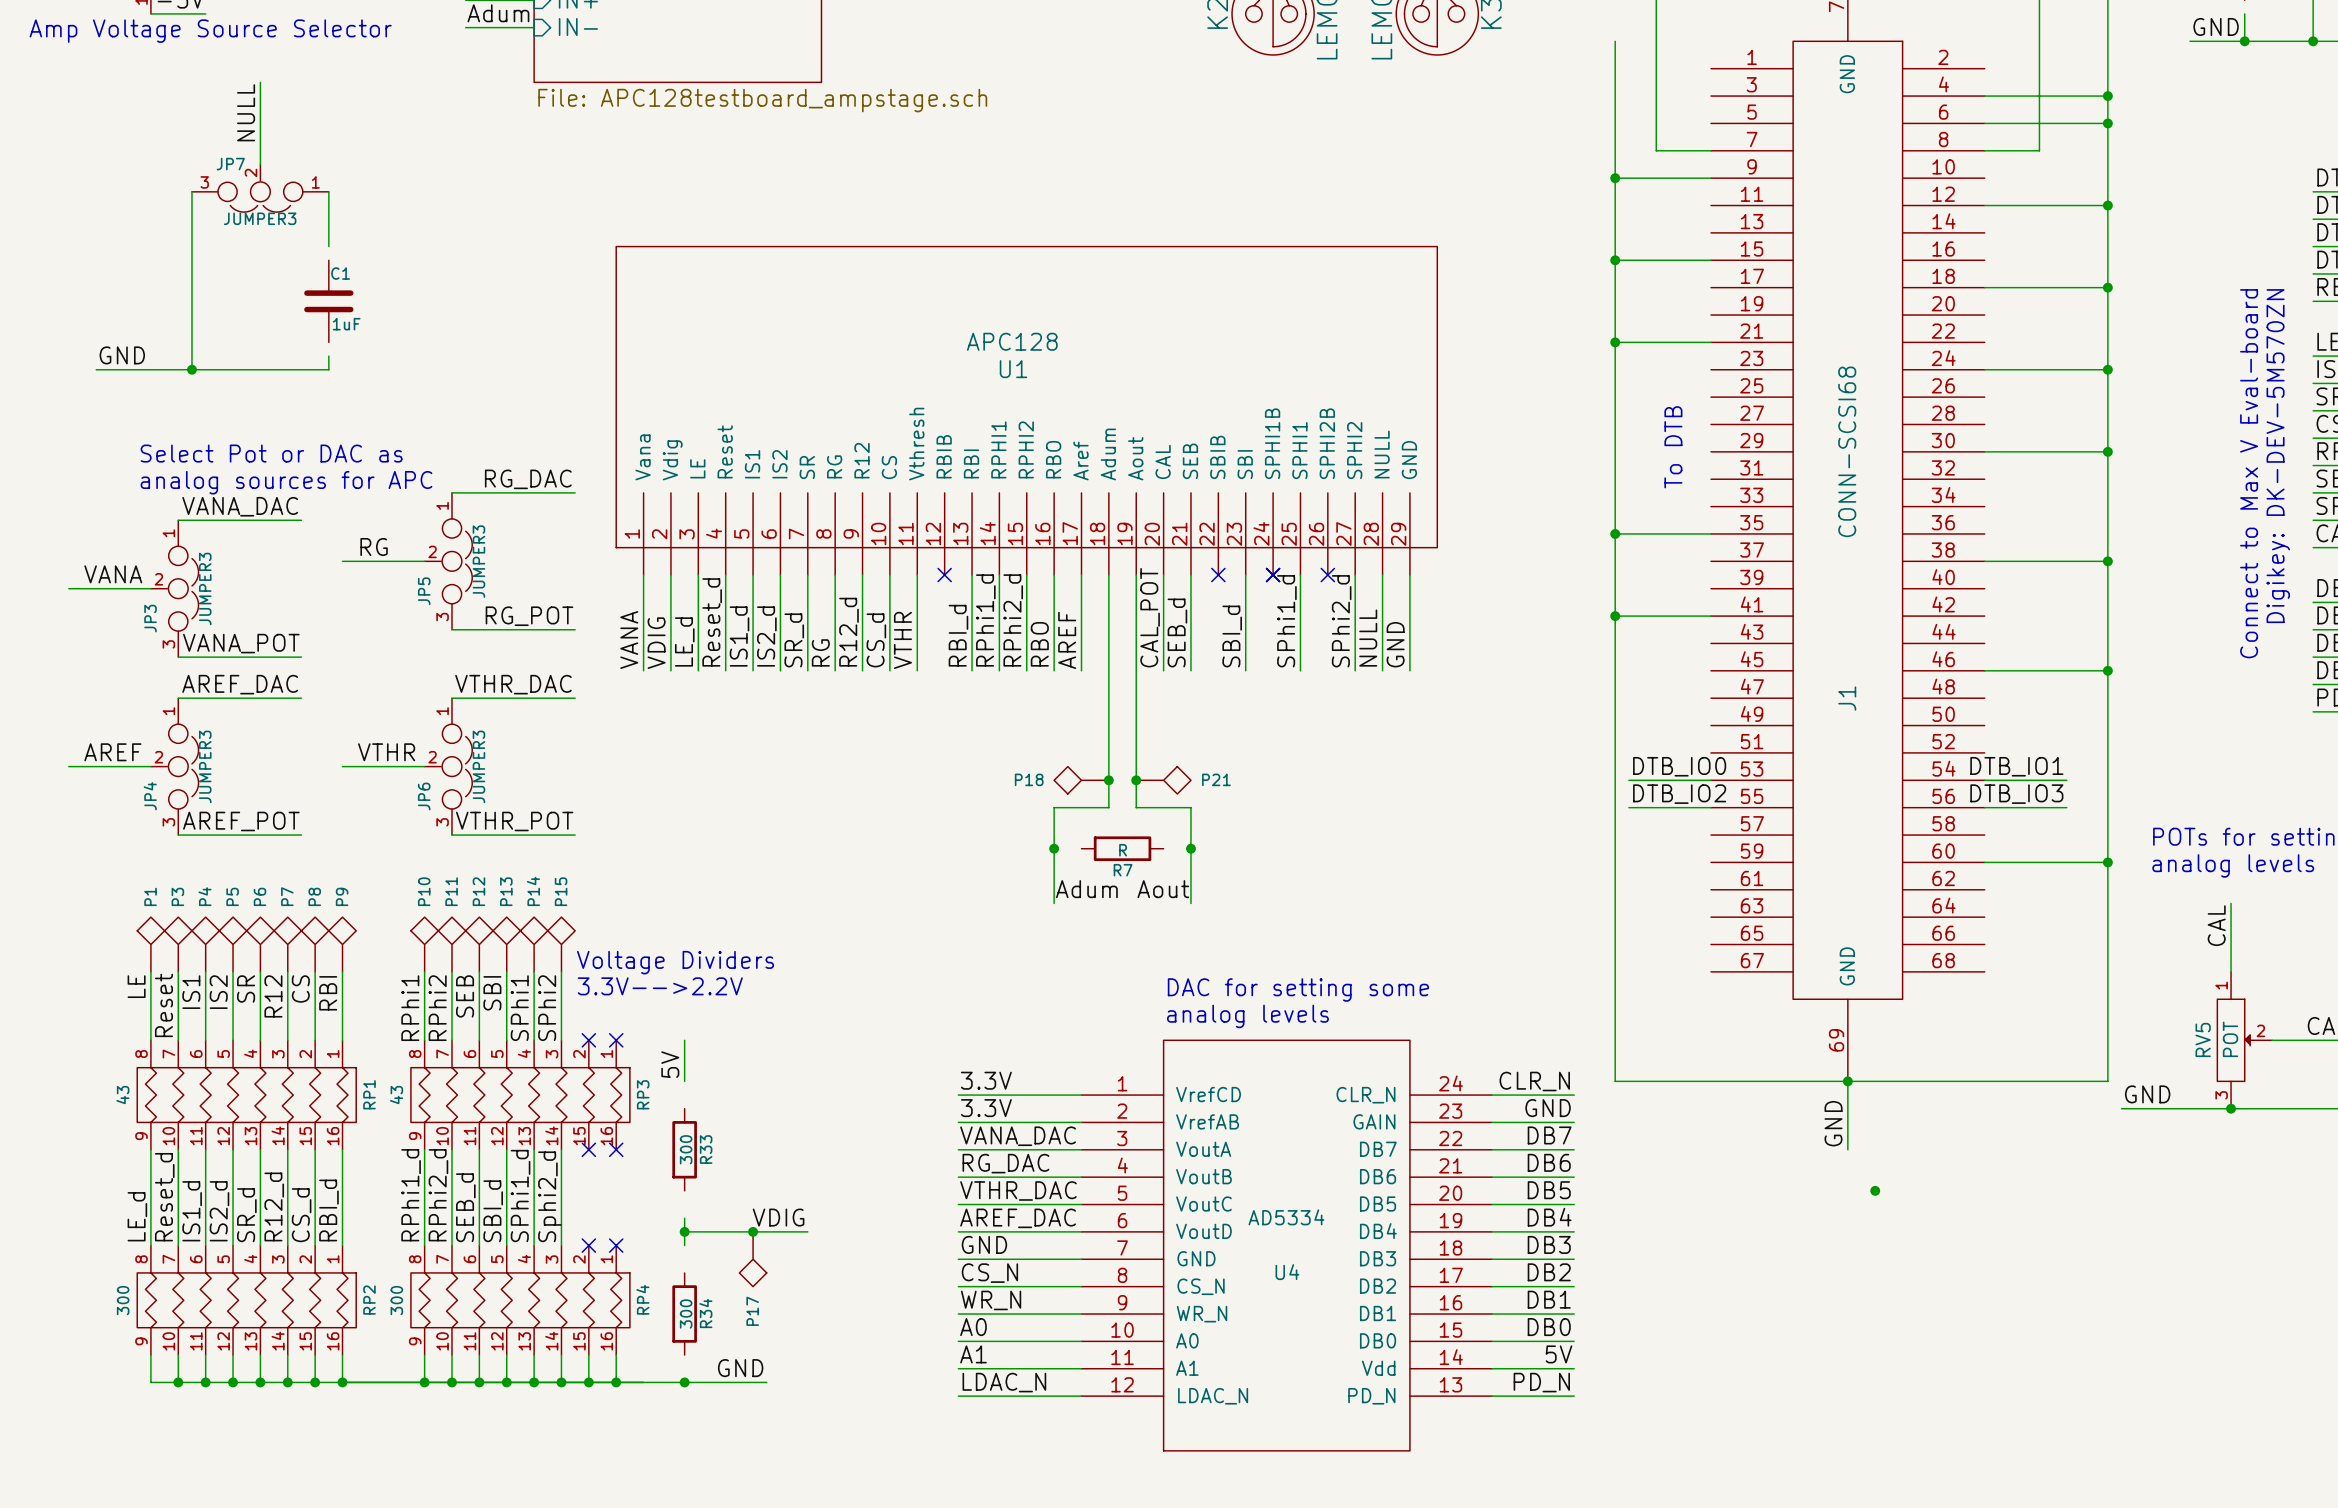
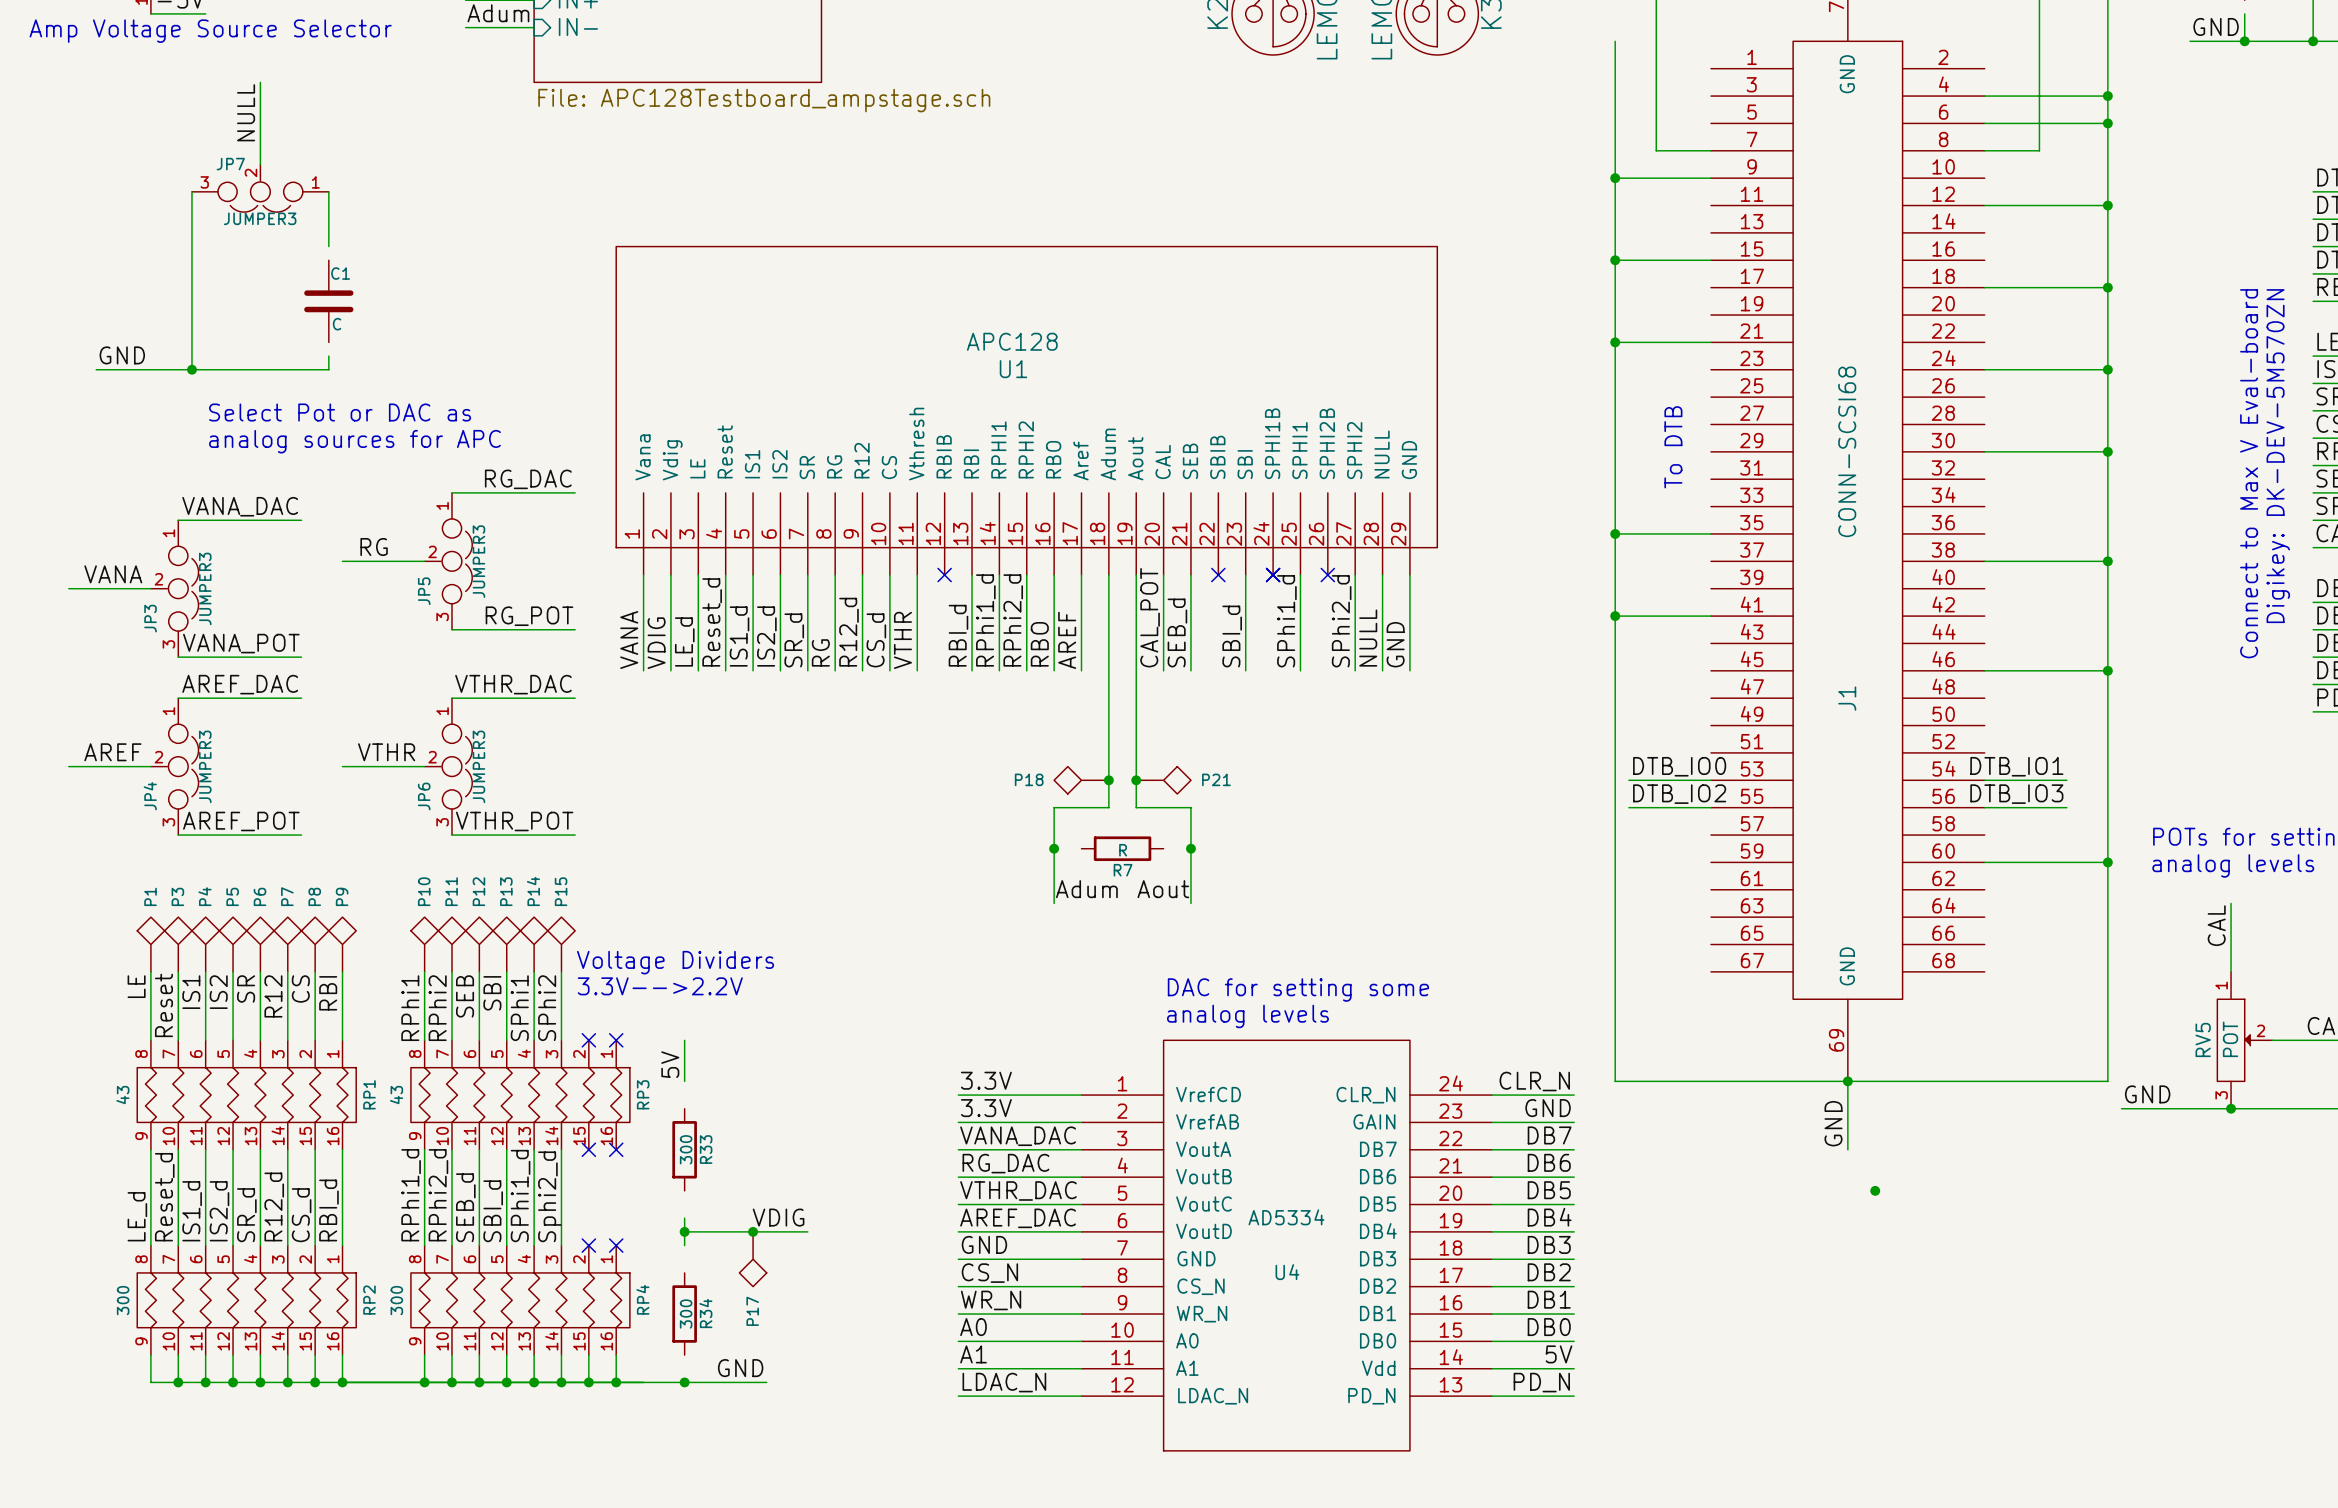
sheet value: File: APC128testboard_ampstage.sch (762, 100) -> File: APC128Testboard_ampstage.sch (764, 100)
C1 value: 1uF (346, 324) -> C (337, 324)
text position: Select Pot or DAC as (271, 453) -> Select Pot or DAC as (340, 412)
text position: analog sources for APC (286, 482) -> analog sources for APC (354, 441)

